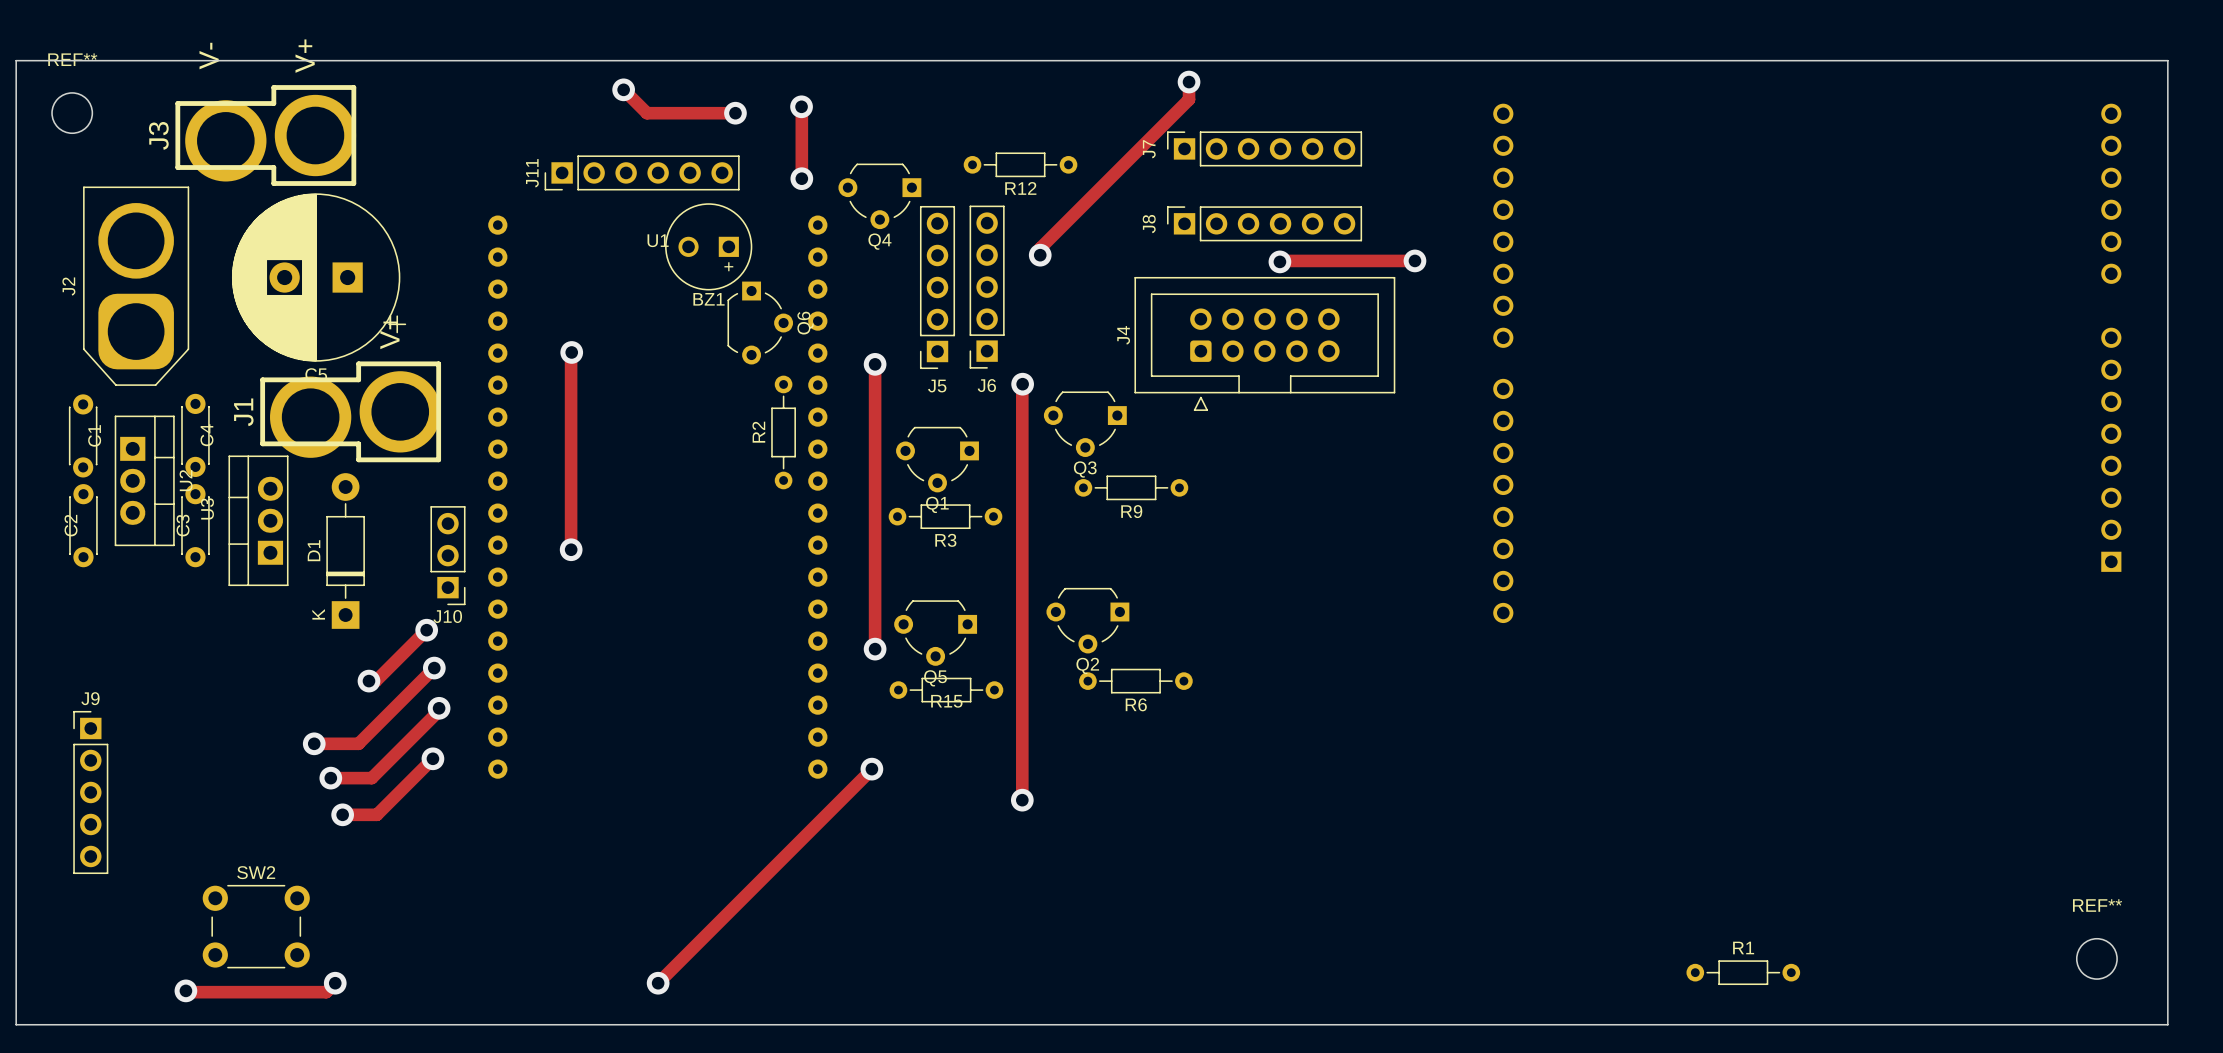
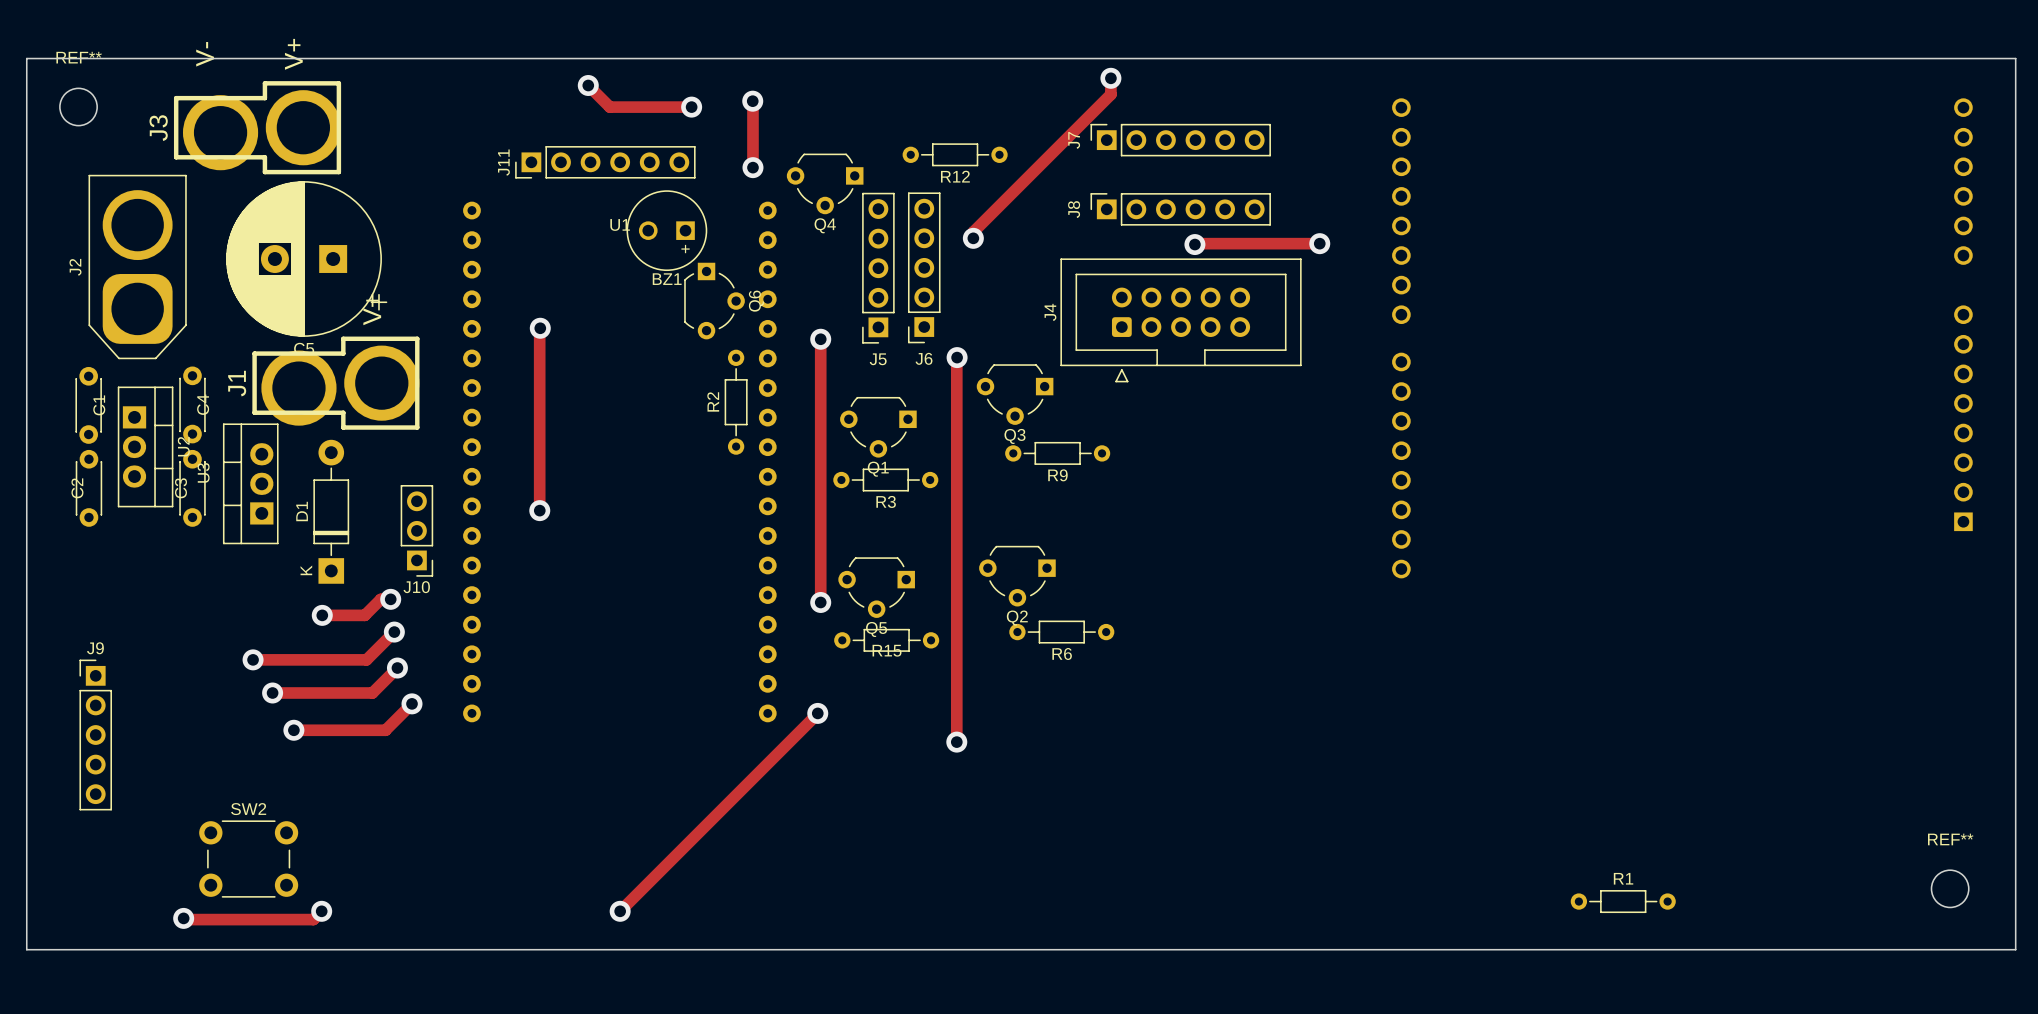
J10 position: (447, 555) -> (416, 530)
track: (426, 630) (375, 681) (368, 681) -> none
via: (426, 630) -> none
track: none -> (390, 599) (380, 599) (364, 615) (322, 615)
via: none -> (390, 599)
via: none -> (322, 615)
track: (434, 668) (358, 743) (314, 743) -> none
via: (434, 668) -> none
via: (368, 681) -> none
track: none -> (394, 632) (366, 659) (253, 659)
via: none -> (394, 632)
track: (439, 708) (439, 710) (371, 778) (330, 778) -> none
via: (439, 708) -> none
via: none -> (253, 659)
track: none -> (397, 668) (372, 693) (272, 693)
via: none -> (397, 668)
via: (314, 743) -> none
via: none -> (272, 693)
via: (330, 778) -> none
via: none -> (293, 730)
track: (404, 787) (376, 814) (342, 814) -> (385, 730) (293, 730)
via: (342, 814) -> none

